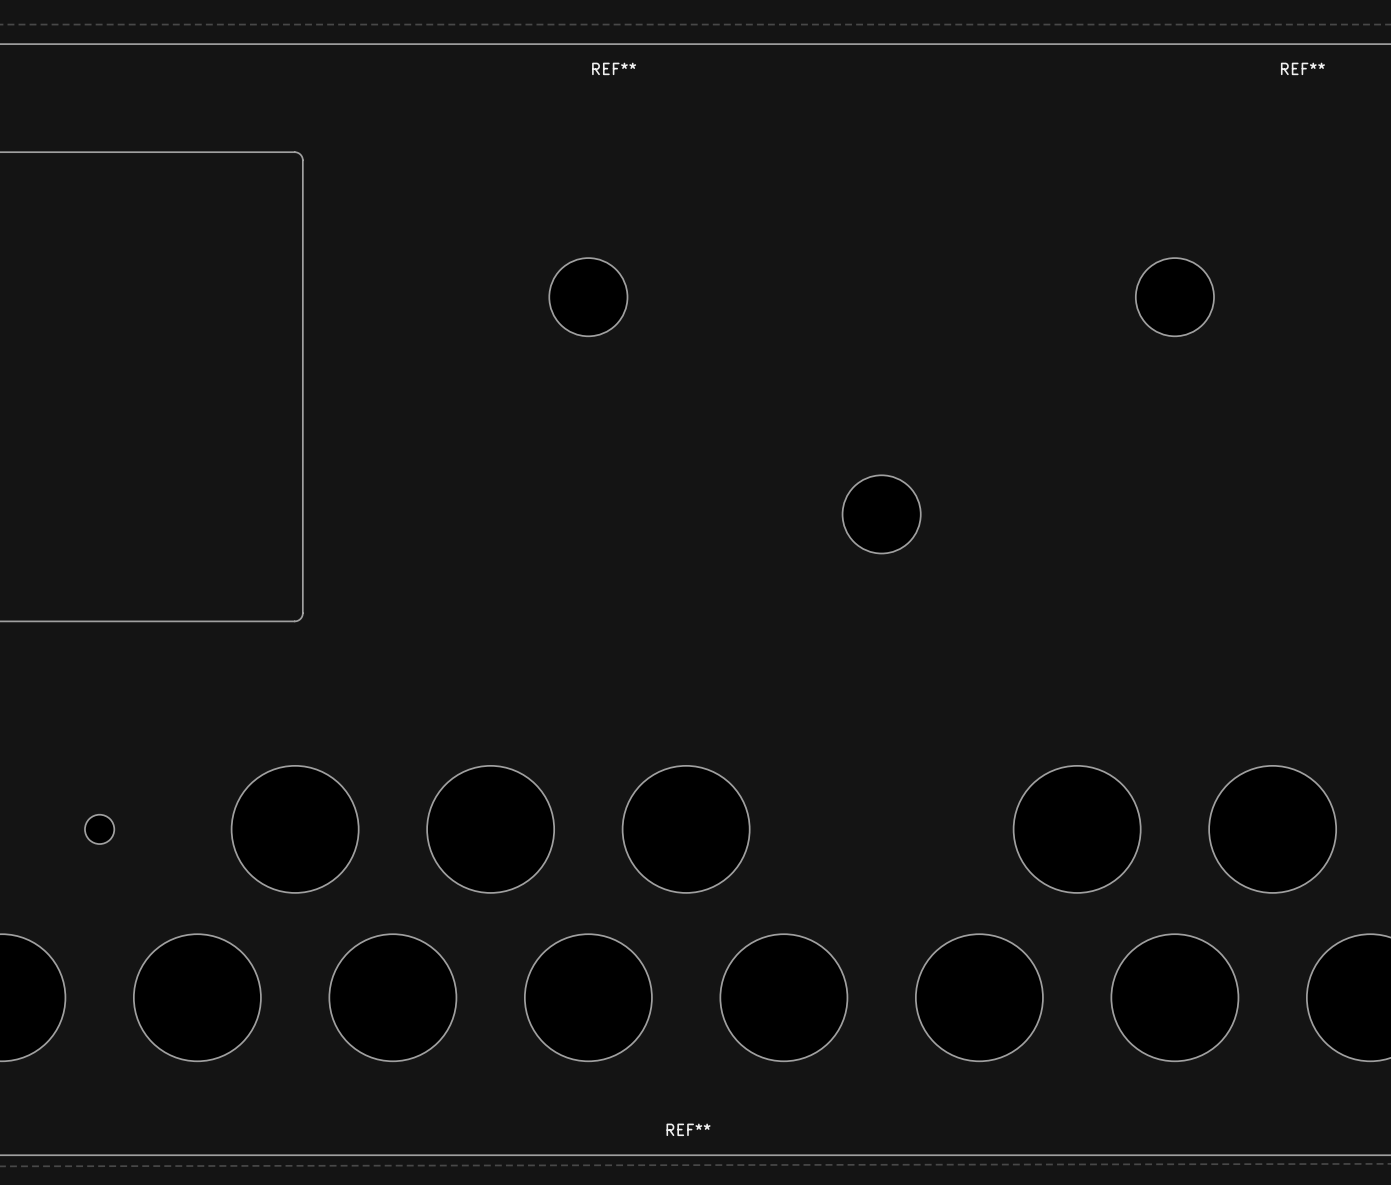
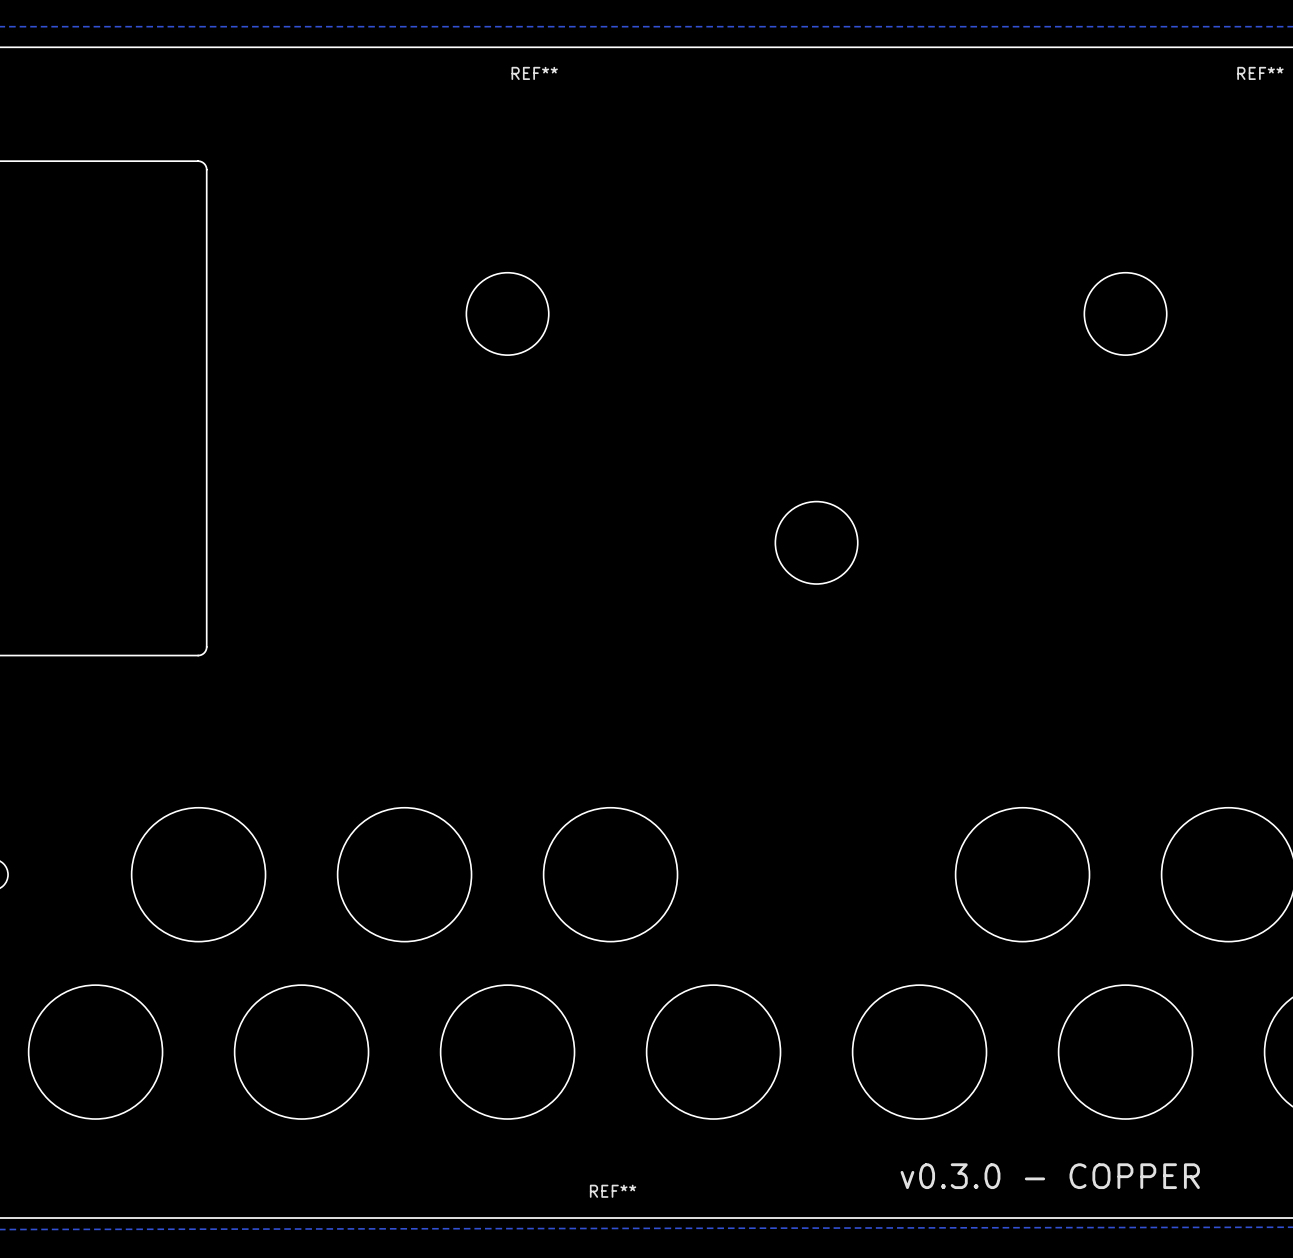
text: none -> v0.3.0 - COPPER (1050, 1176)

